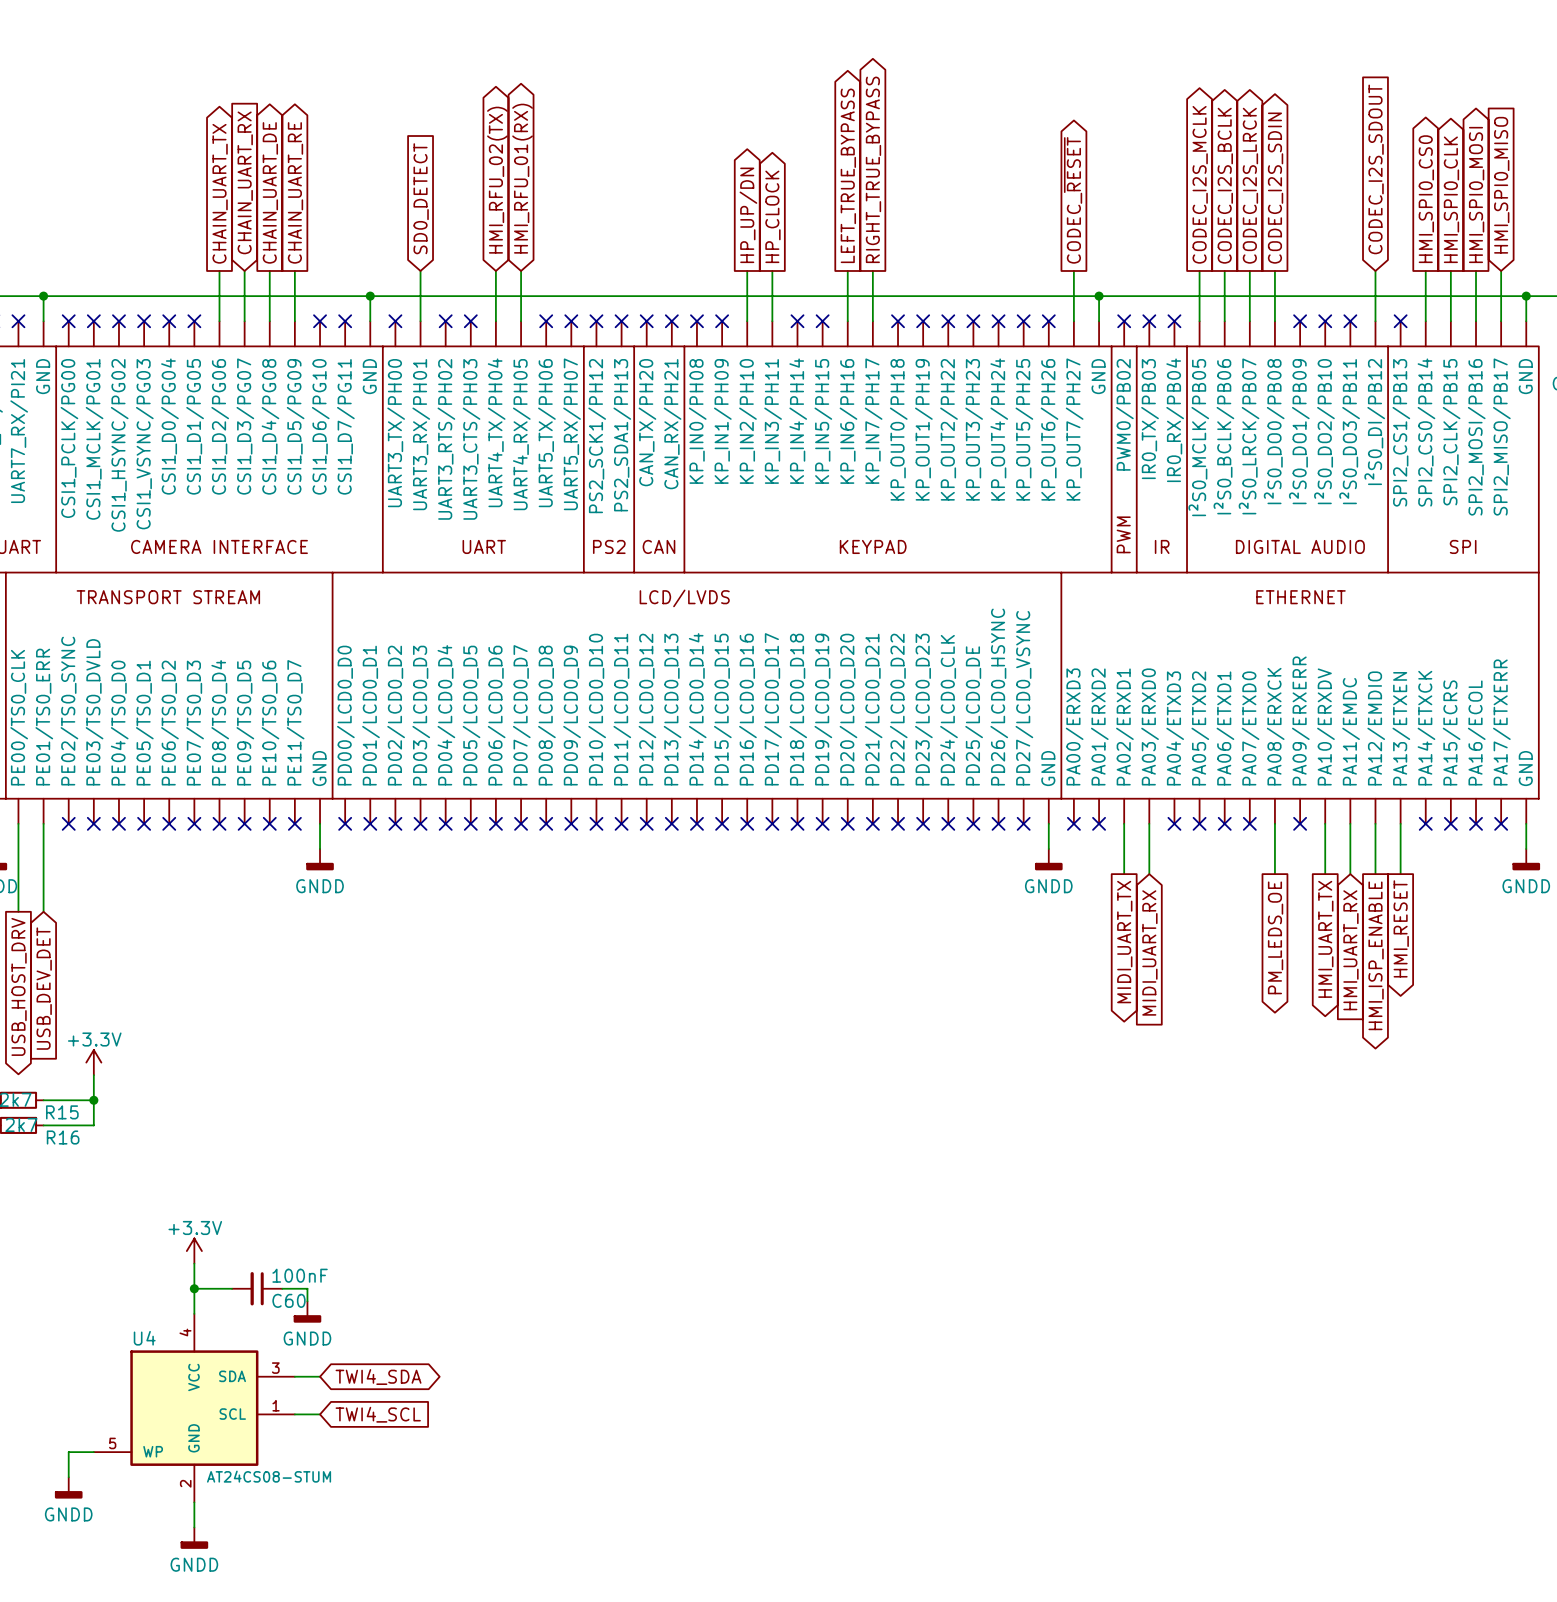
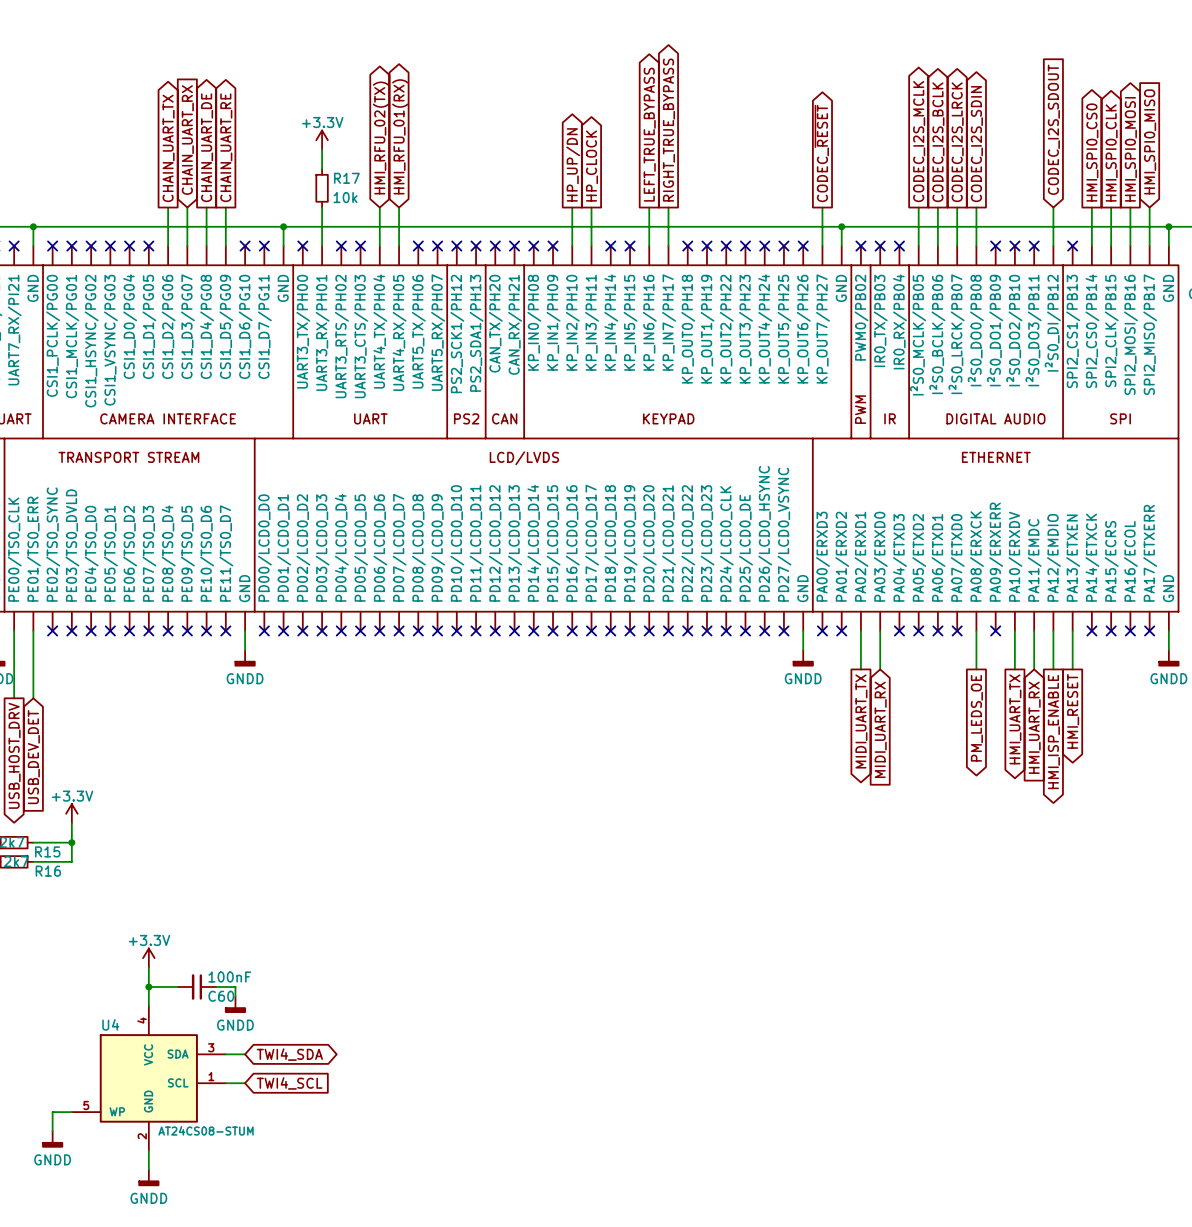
power symbol: none -> +3.3V (322, 140)
wire: none -> (322, 149) (322, 169)
global label: SD0_DETECT (421, 198) -> none
R17: none -> 10k (322, 188)

